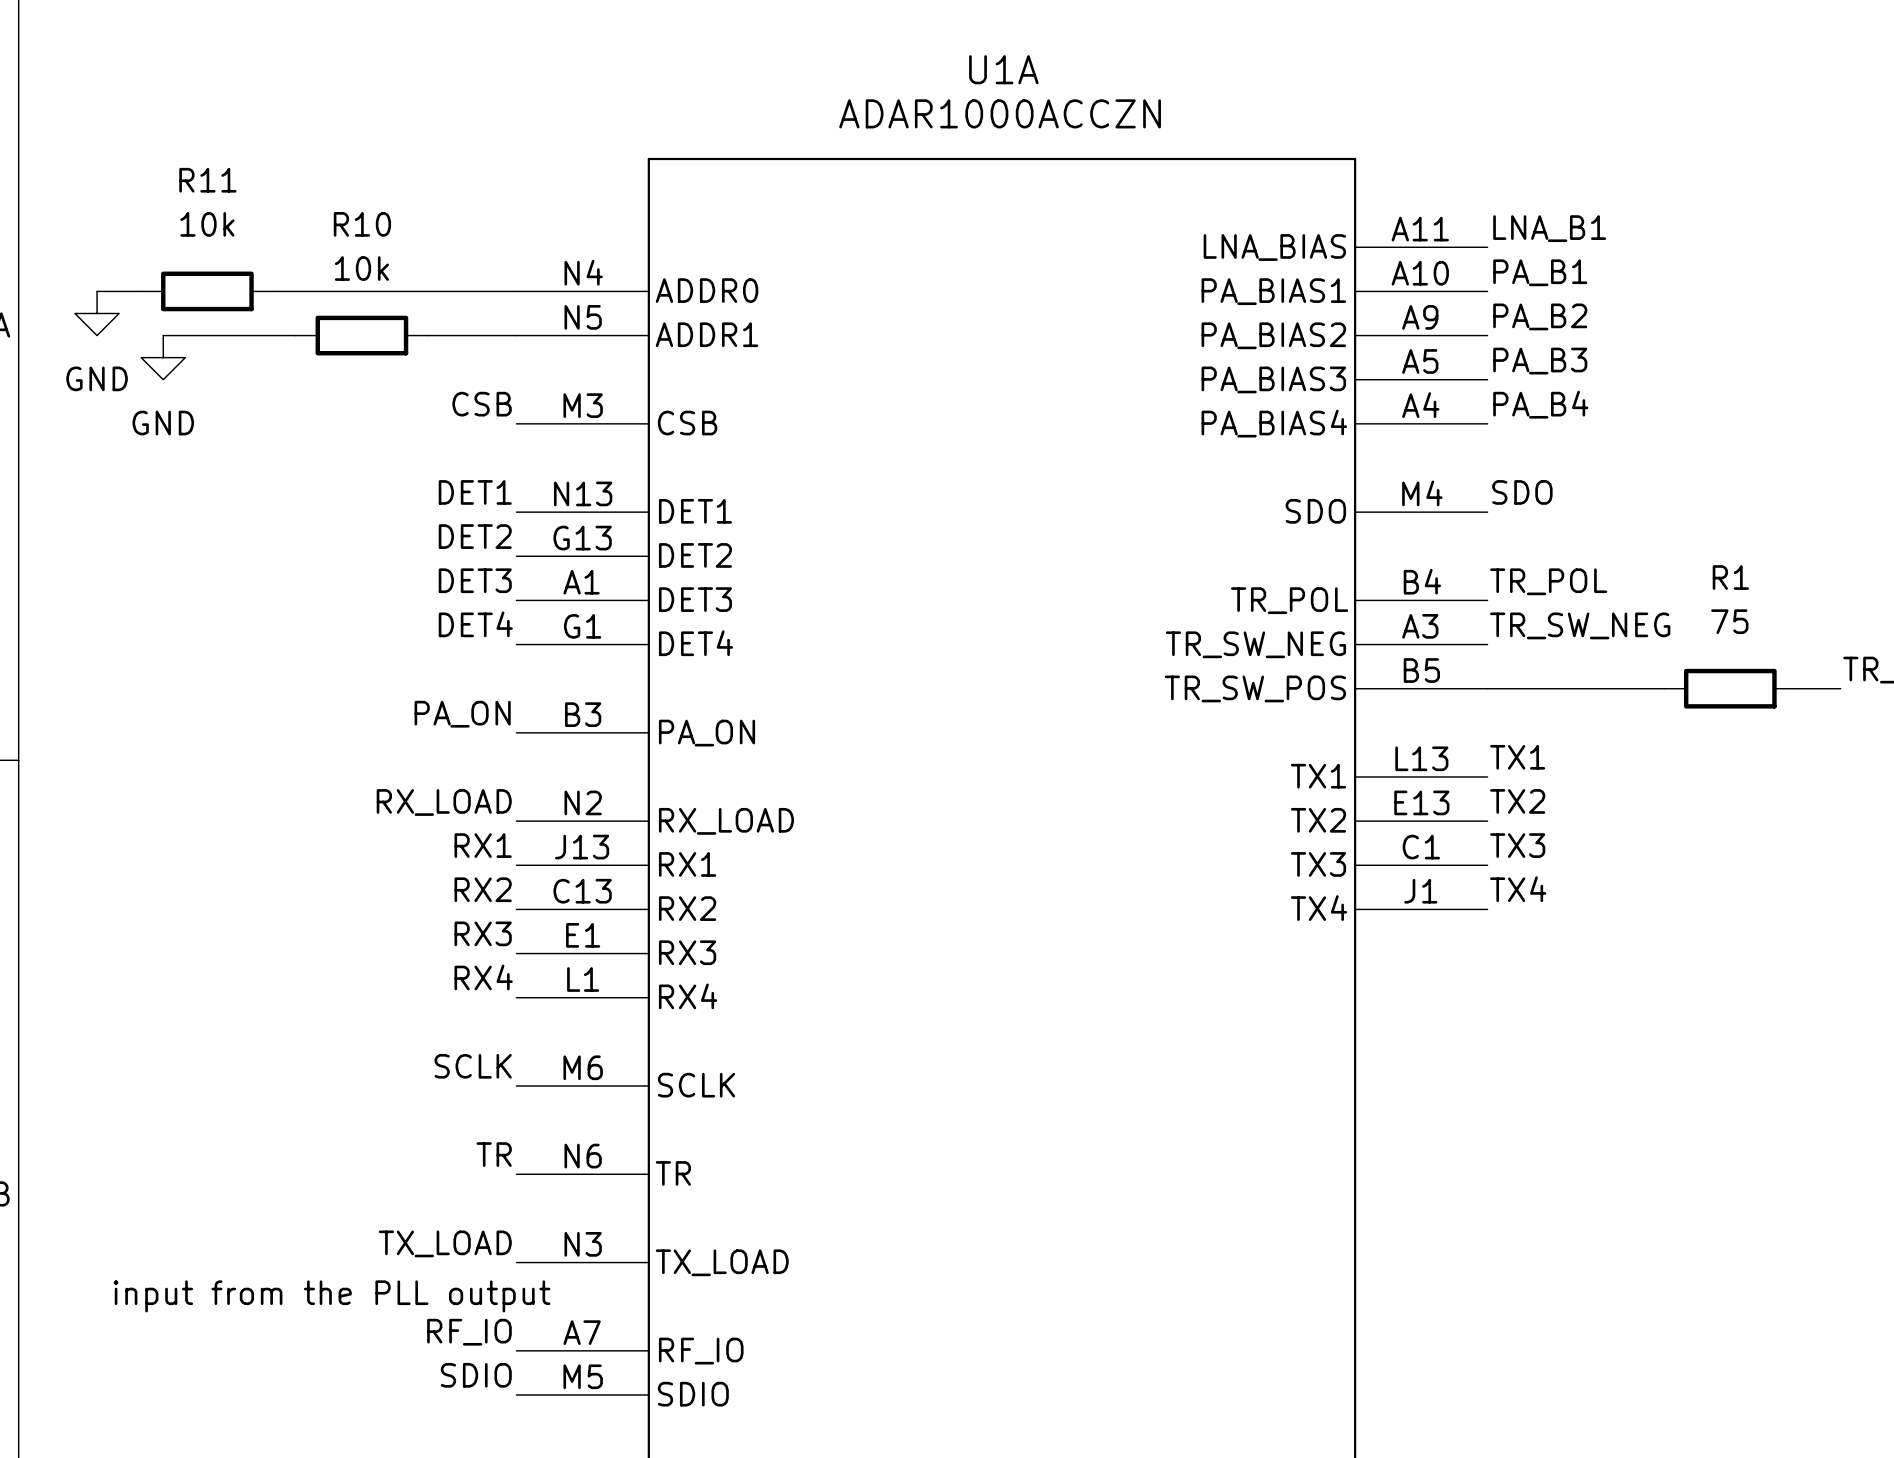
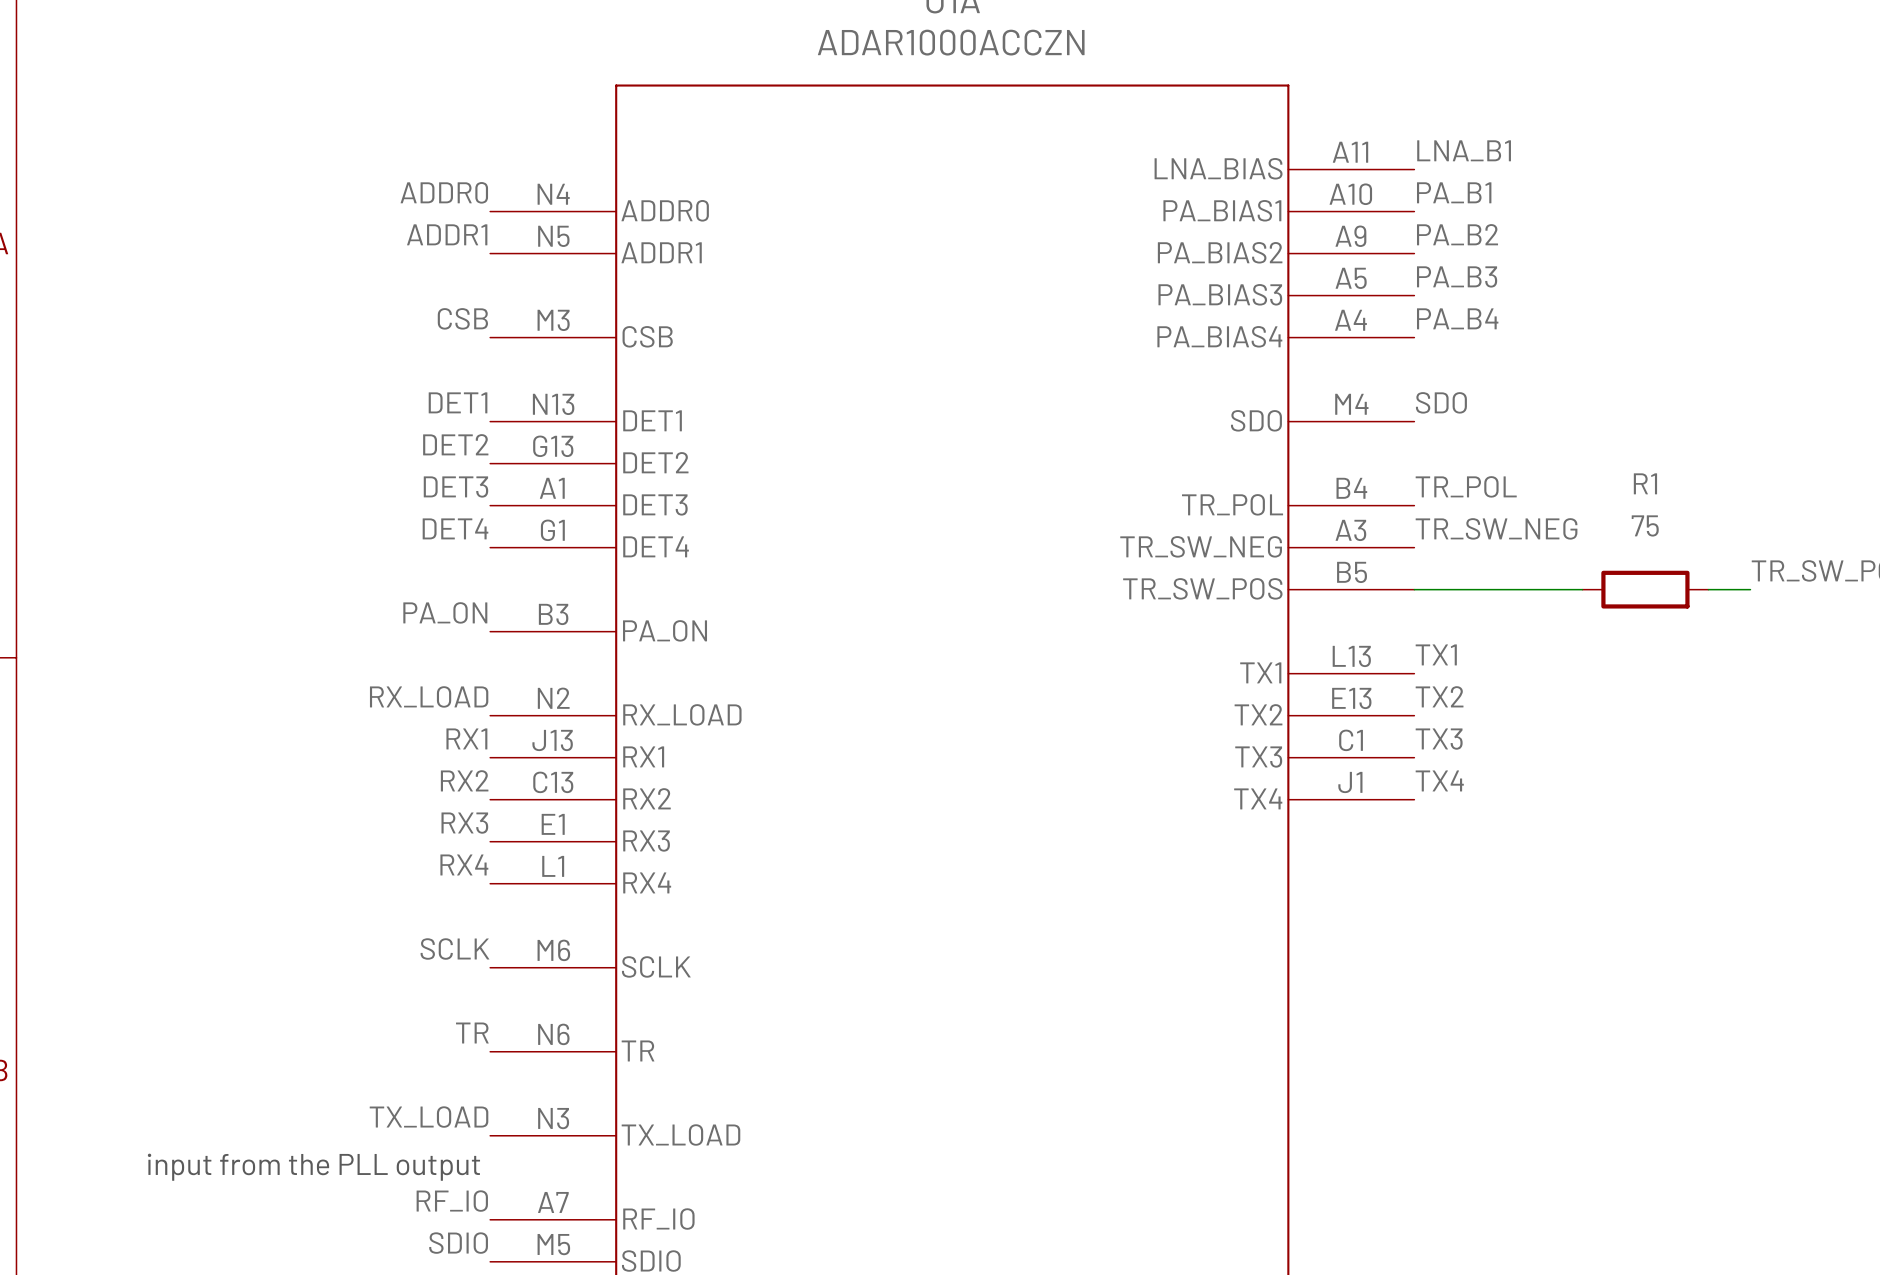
label: none -> ADDR0 (444, 192)
wire: (97, 291) (141, 291) -> none
R11: 10k (207, 291) -> none
wire: (273, 291) (516, 291) -> none
power symbol: GND (97, 313) -> none
label: none -> ADDR1 (447, 234)
wire: (163, 335) (295, 335) -> none
R10: 10k (361, 335) -> none
wire: (428, 335) (516, 335) -> none
power symbol: GND (163, 357) -> none

